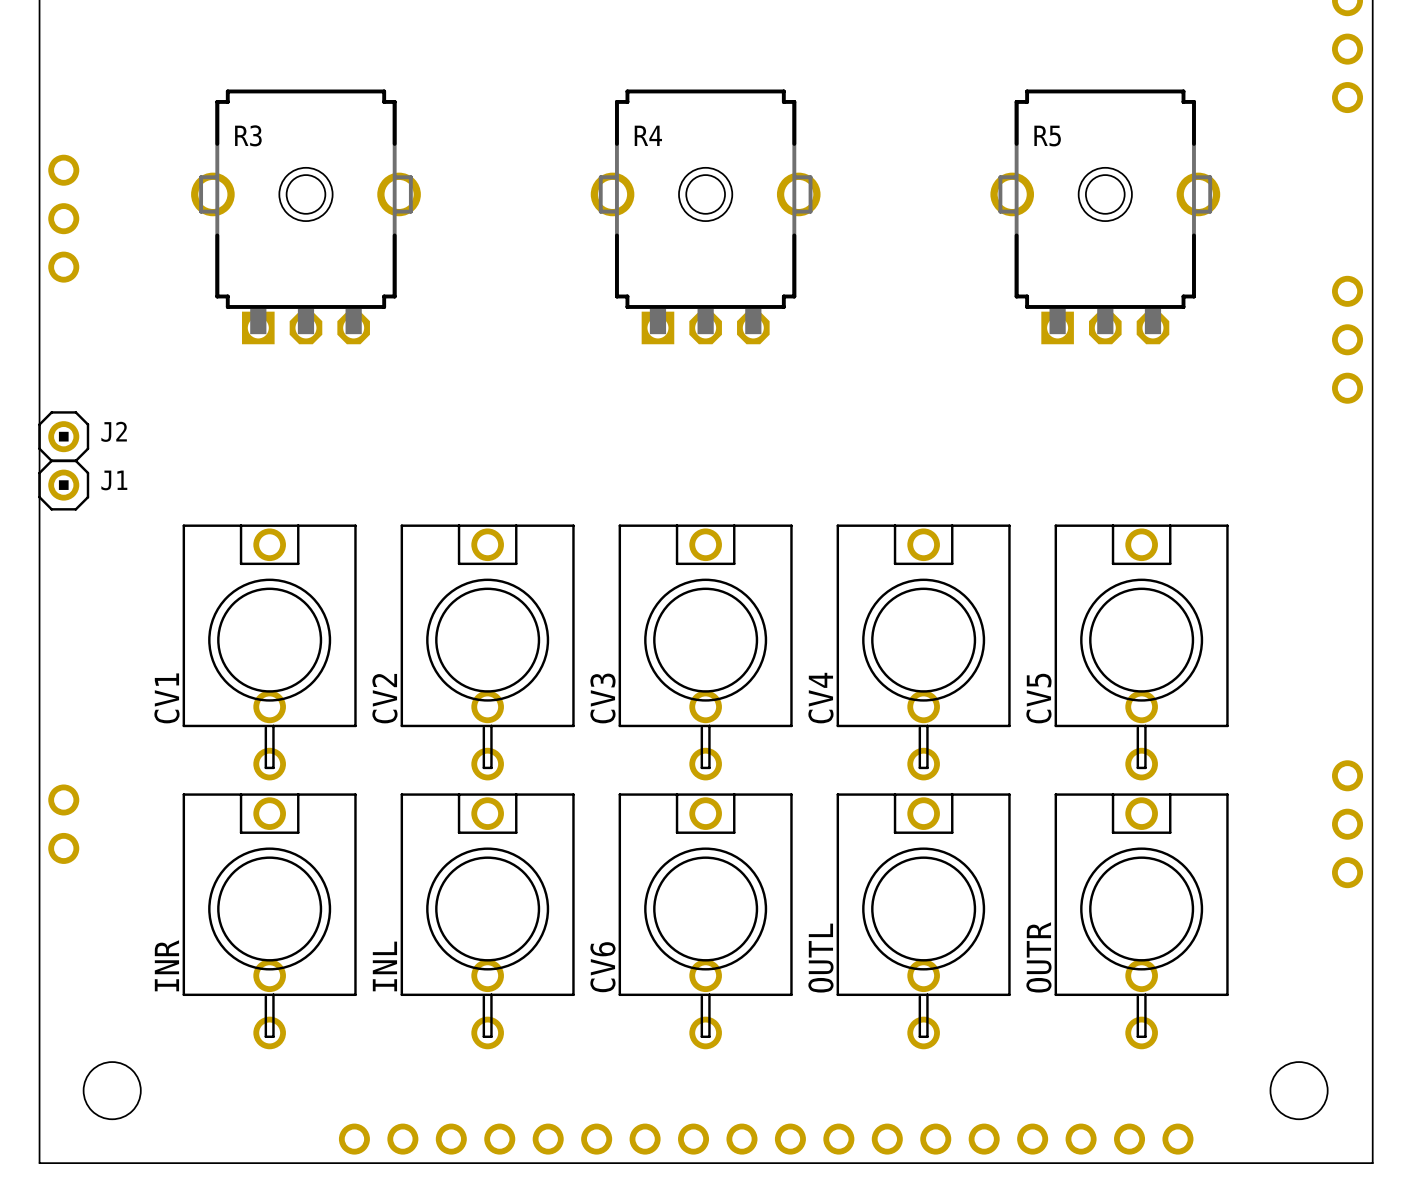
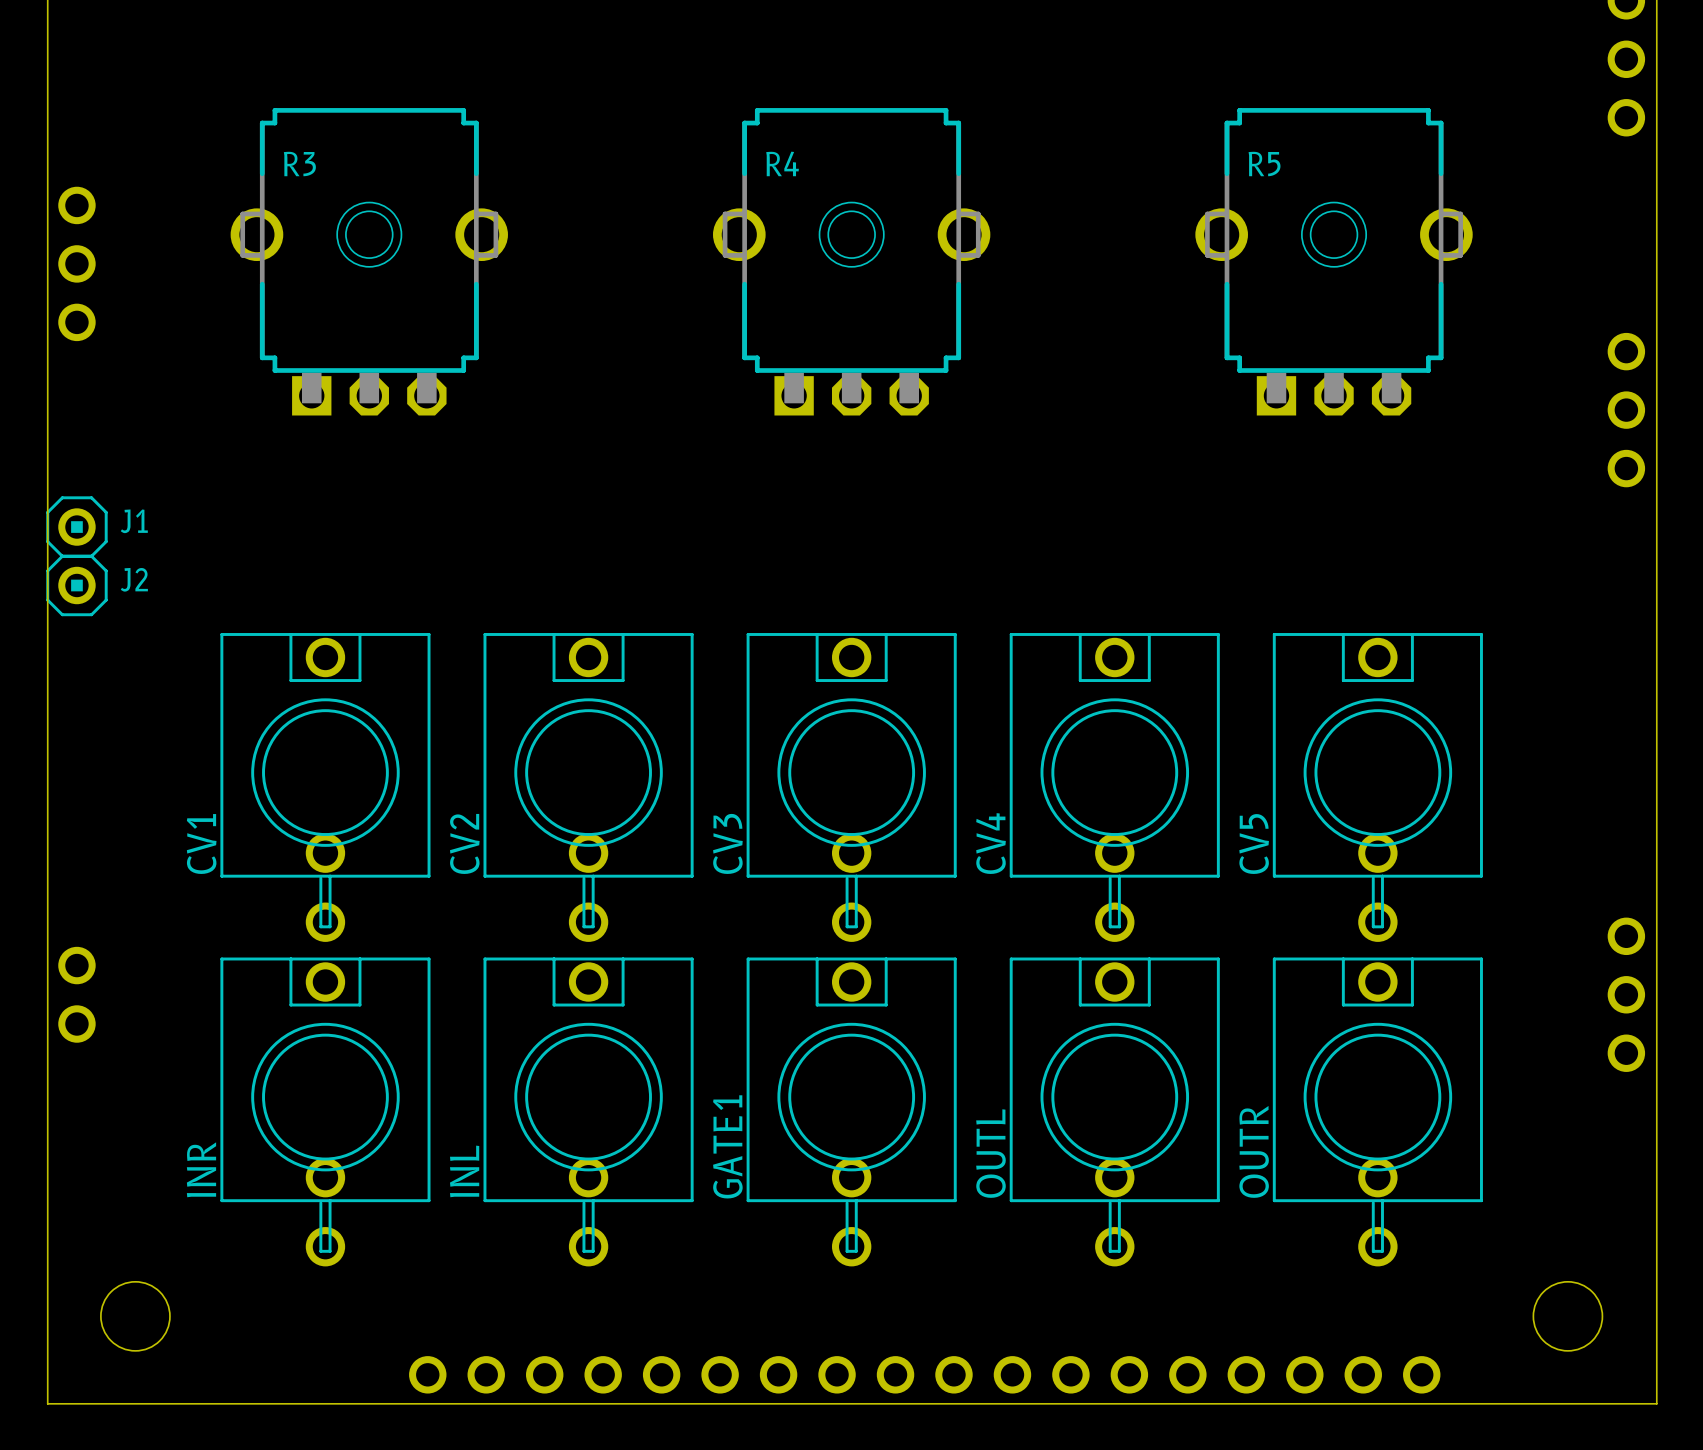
J2 name: J2 (114, 431) -> J1 (134, 521)
J1 name: J1 (114, 480) -> J2 (134, 579)
CV6 name: CV6 (602, 967) -> GATE1 (727, 1146)

